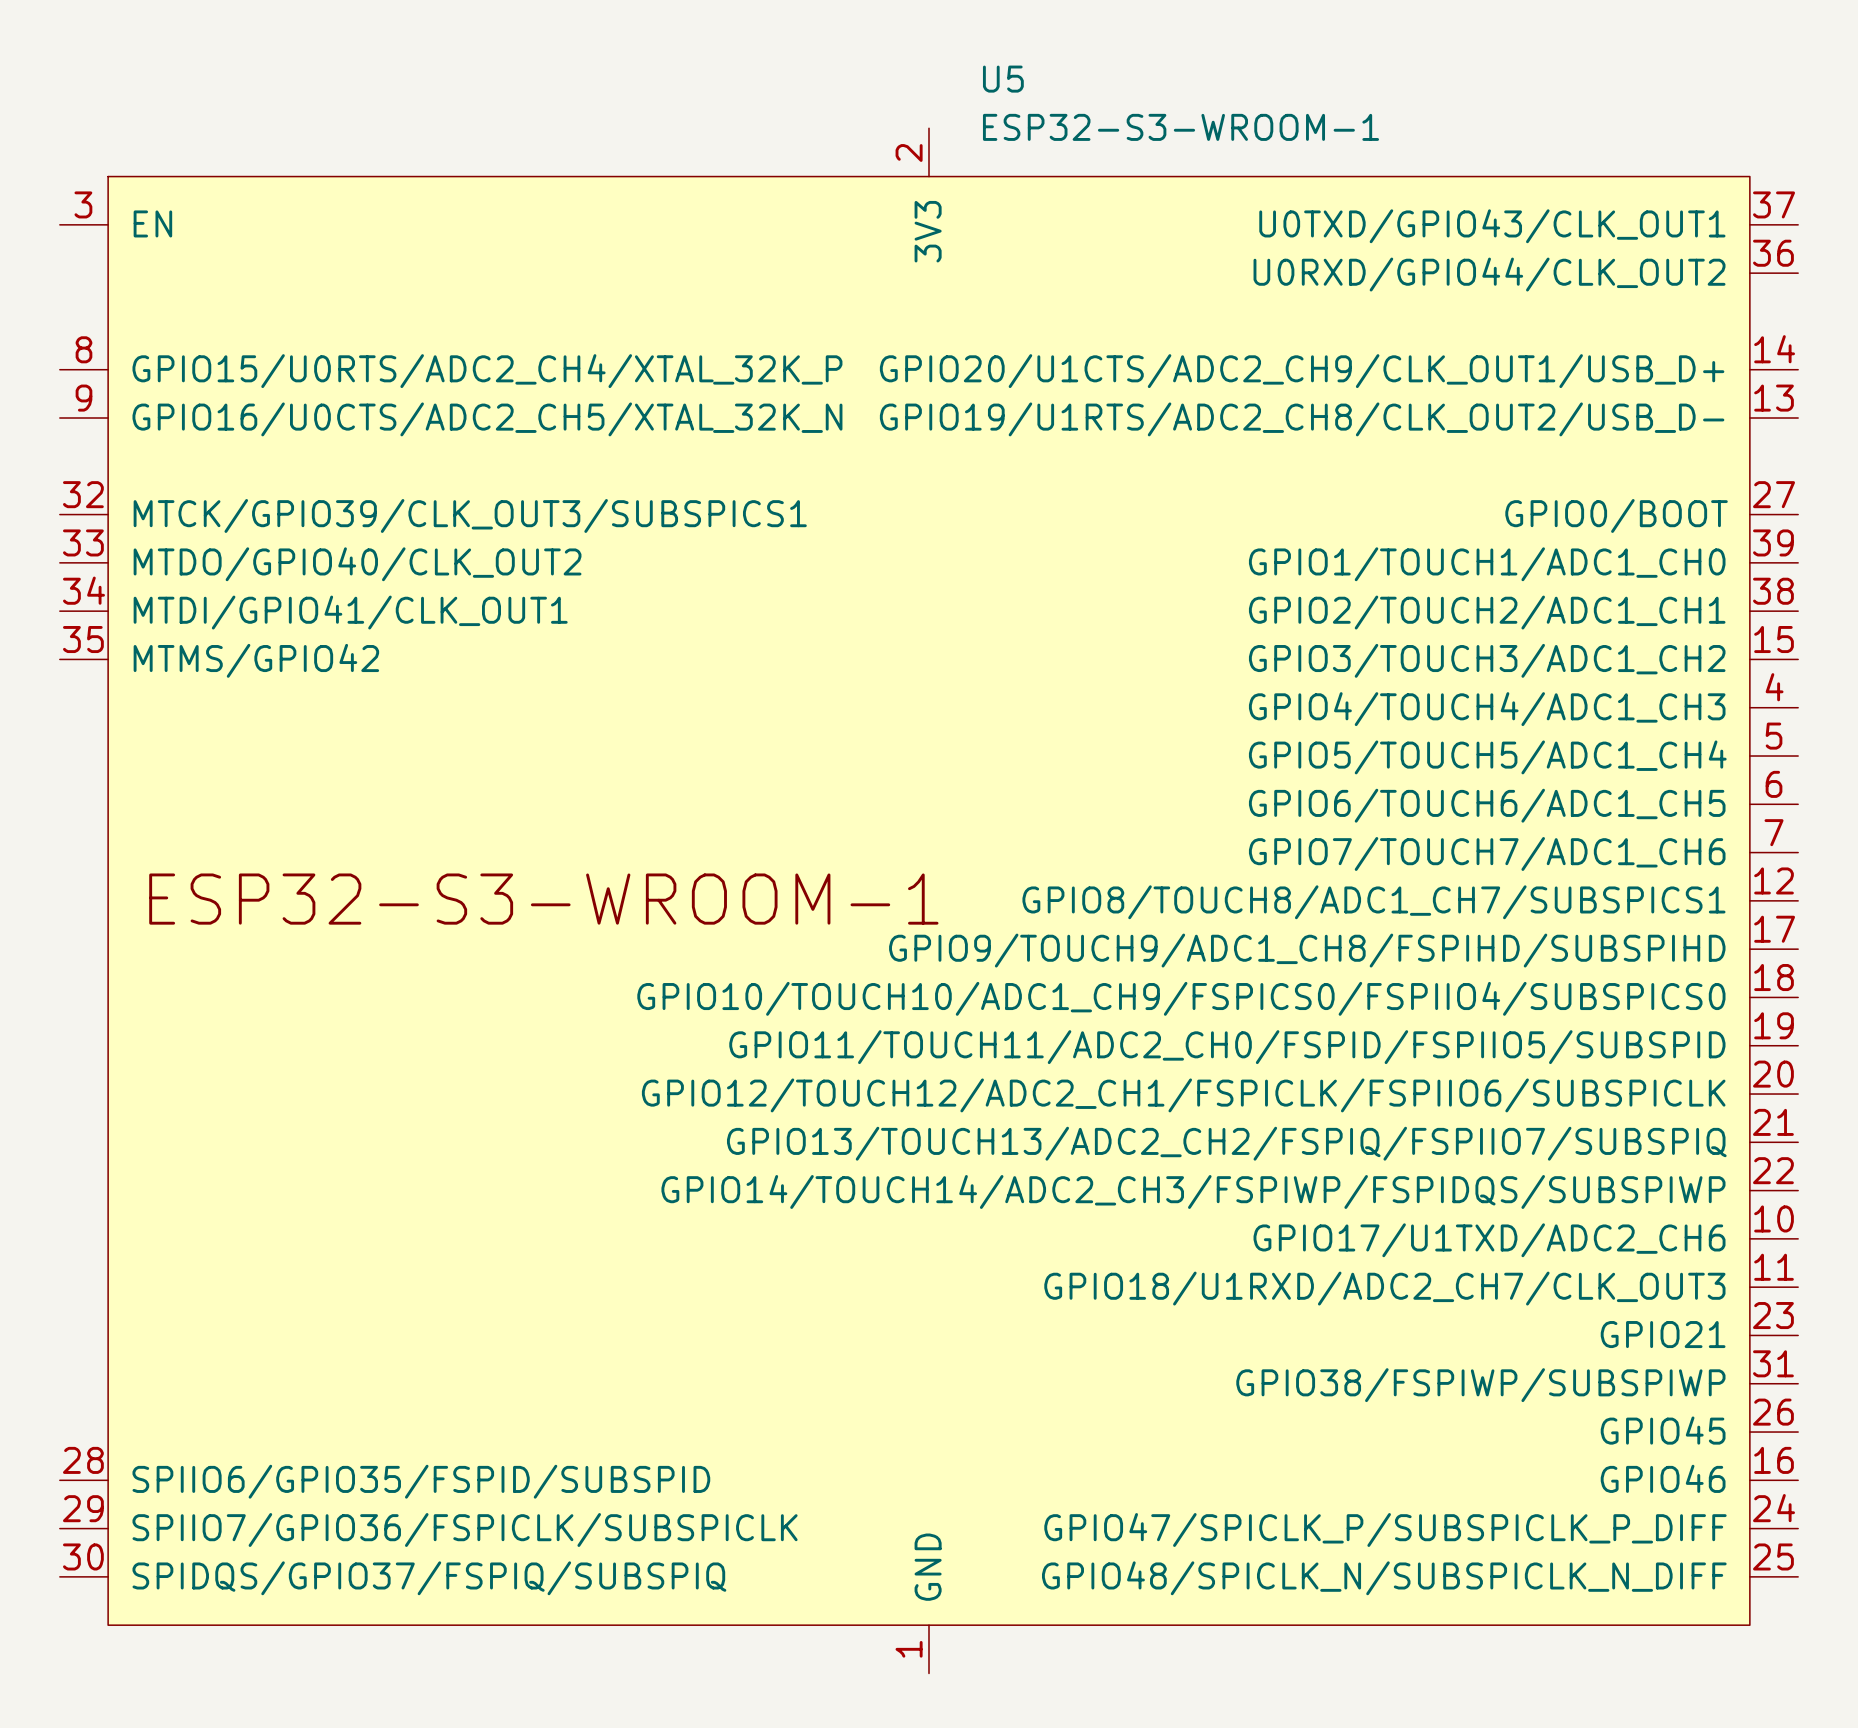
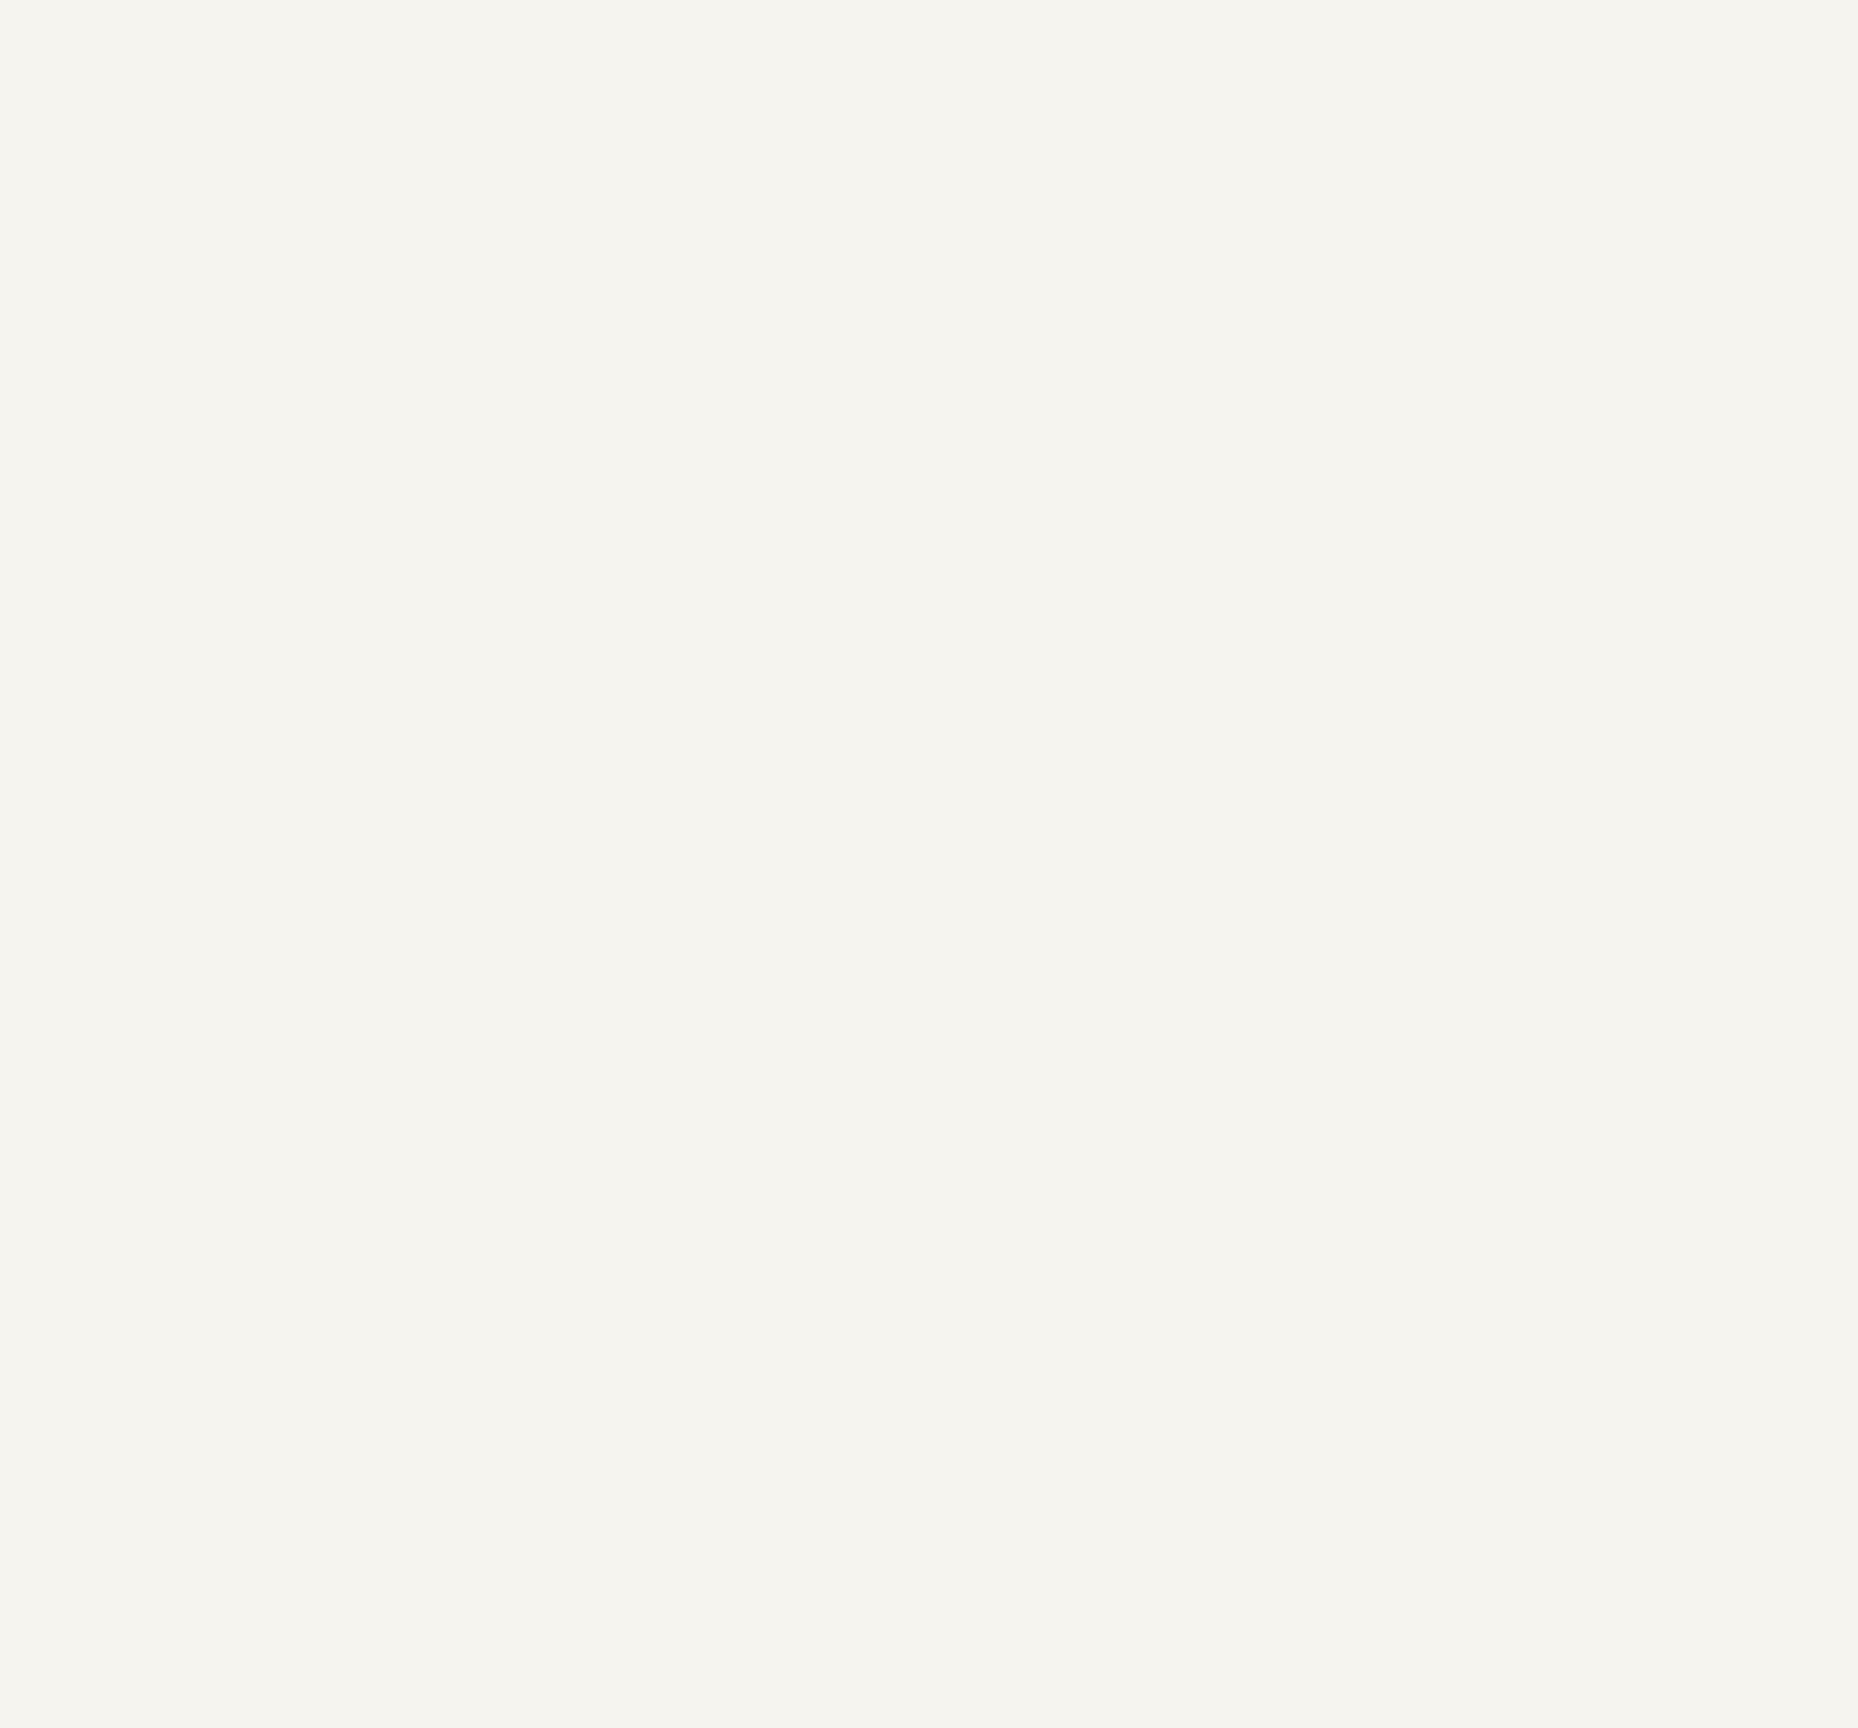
U5: ESP32-S3-WROOM-1 (928, 900) -> none

